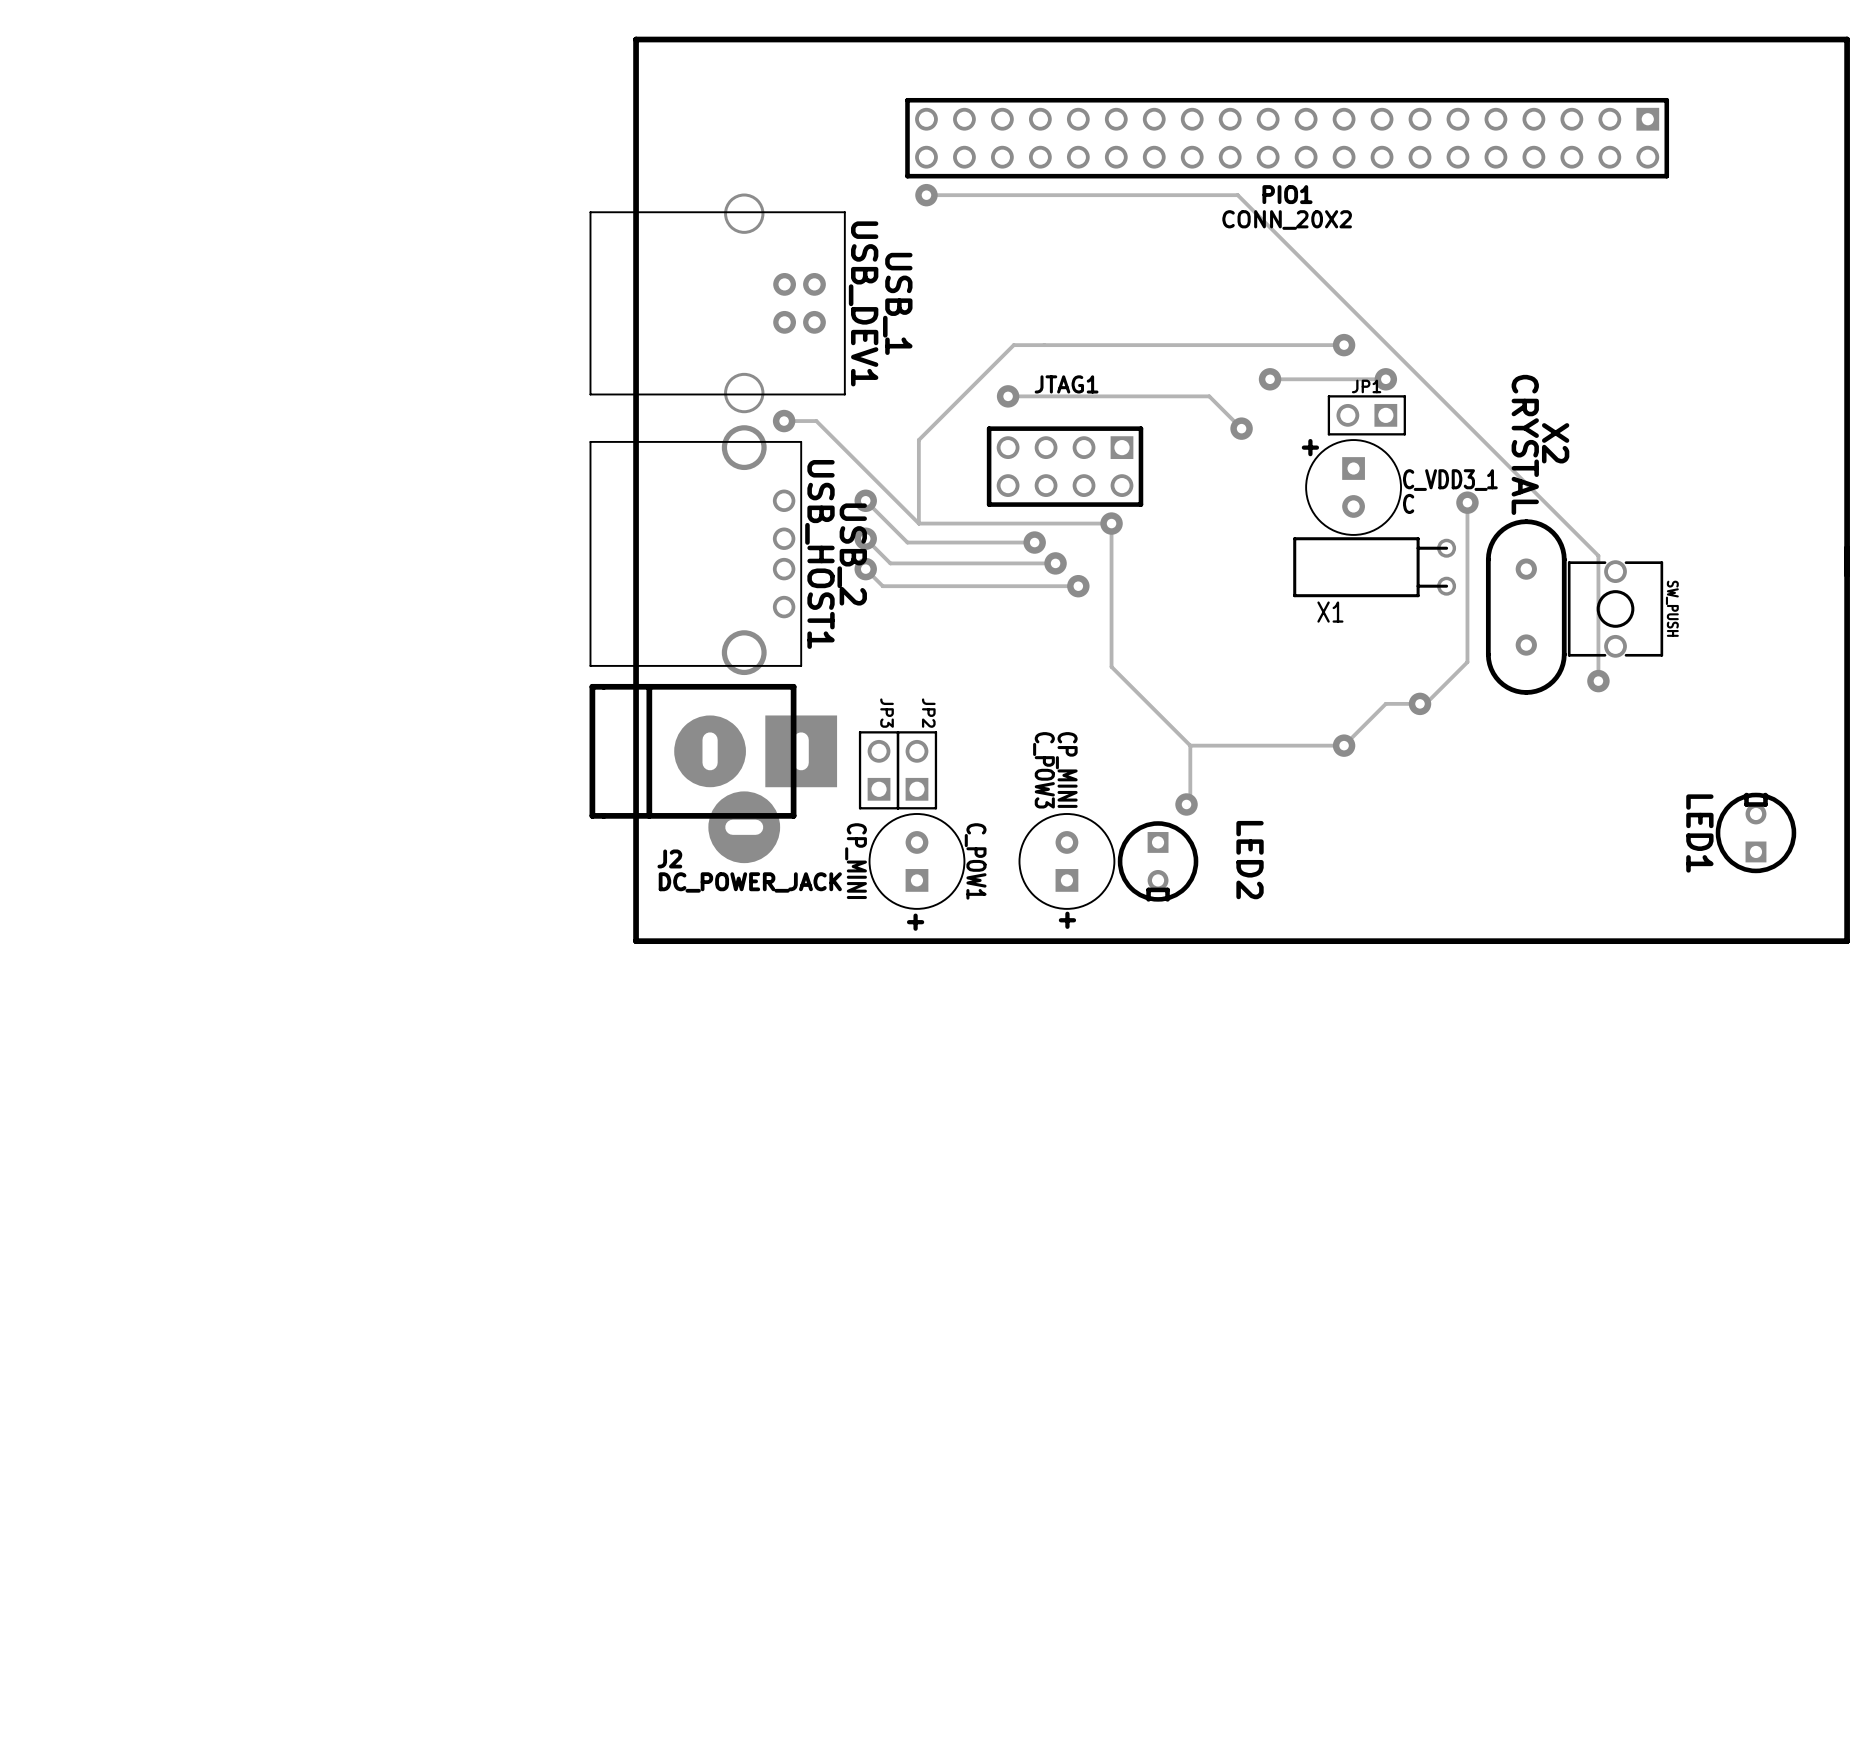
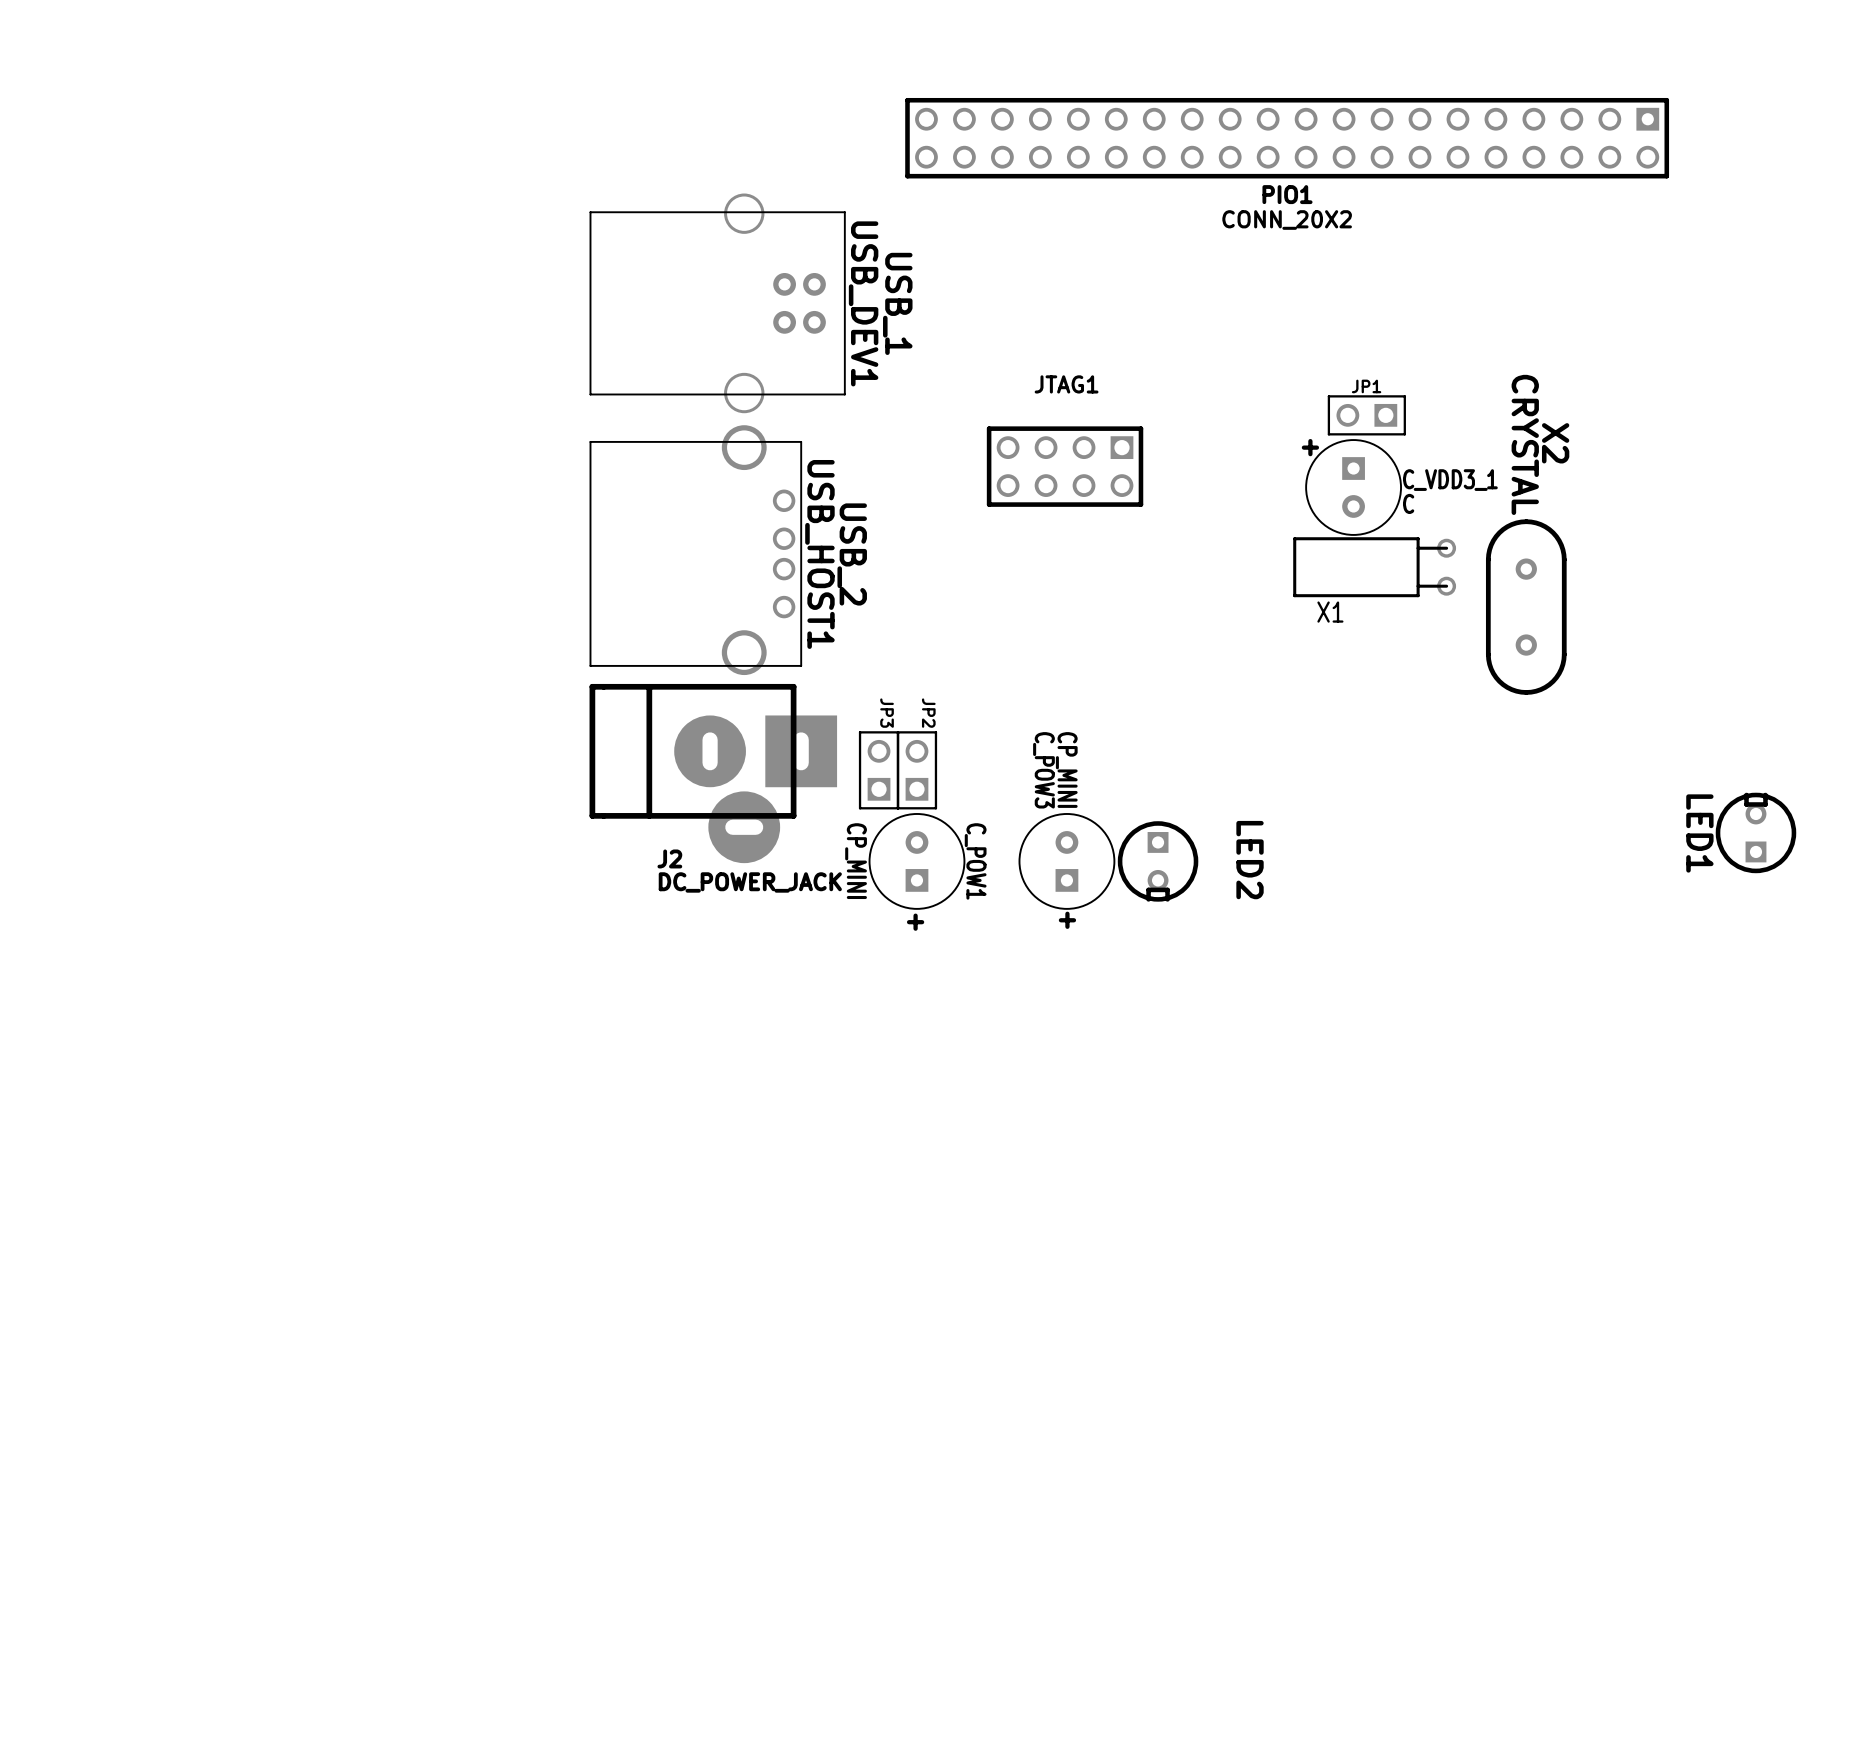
board edge: (1847, 39) (1847, 941) (636, 941) (636, 39) (1847, 39) -> none
track: (926, 195) (1237, 195) (1598, 555) (1598, 681) -> none
via: (926, 195) -> none
track: (1344, 345) (1013, 345) (918, 440) (918, 523) -> none
via: (1344, 345) -> none
via: (1270, 379) -> none
track: (1385, 379) (1270, 379) -> none
via: (1385, 379) -> none
track: (1008, 396) (1209, 396) (1241, 428) -> none
via: (1008, 396) -> none
track: (784, 421) (816, 421) (918, 523) -> none
via: (784, 421) -> none
via: (1241, 428) -> none
track: (865, 500) (907, 542) (1034, 542) -> none
via: (865, 500) -> none
track: (1467, 502) (1467, 662) (1425, 703) (1385, 703) (1344, 745) (1190, 745) -> none
via: (1467, 502) -> none
track: (918, 523) (1111, 523) (1111, 666) (1190, 745) -> none
via: (1111, 523) -> none
track: (865, 538) (890, 563) (1055, 563) -> none
via: (865, 538) -> none
via: (1034, 542) -> none
via: (1055, 563) -> none
track: (865, 569) (882, 586) (1078, 586) -> none
via: (865, 569) -> none
via: (1078, 586) -> none
part: SW_PUSH (1615, 608) -> none
via: (1598, 681) -> none
via: (1420, 703) -> none
track: (1190, 745) (1190, 800) (1186, 804) -> none
via: (1344, 745) -> none
via: (1186, 804) -> none

